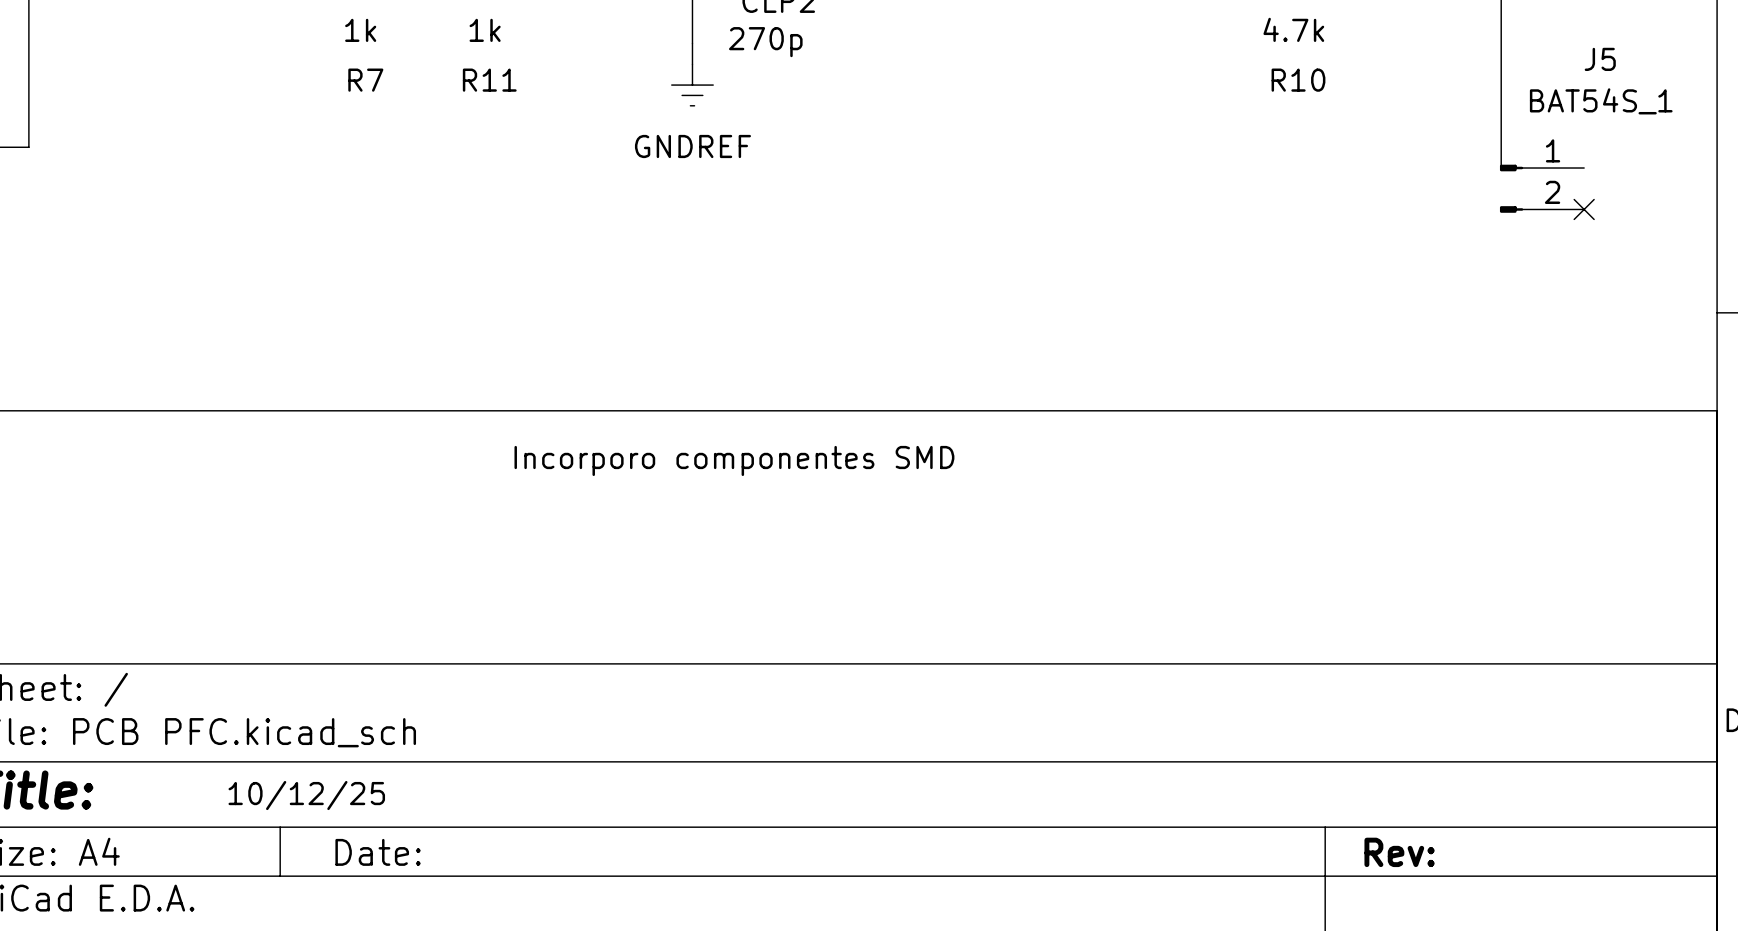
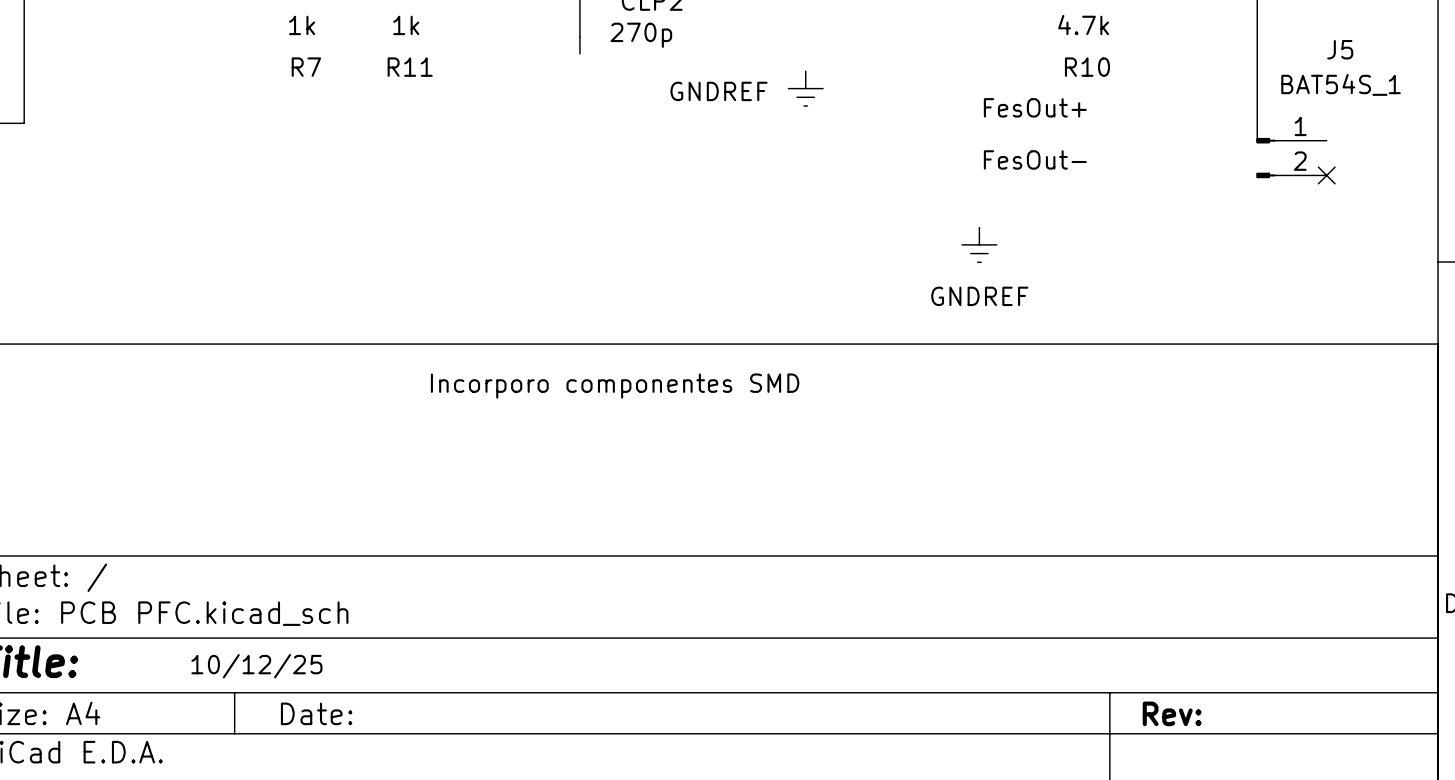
power symbol: GNDREF (692, 85) -> none
power symbol: none -> GNDREF (805, 88)
label: none -> FesOut+ (1035, 107)
label: none -> FesOut- (1035, 159)
power symbol: none -> GNDREF (979, 244)

